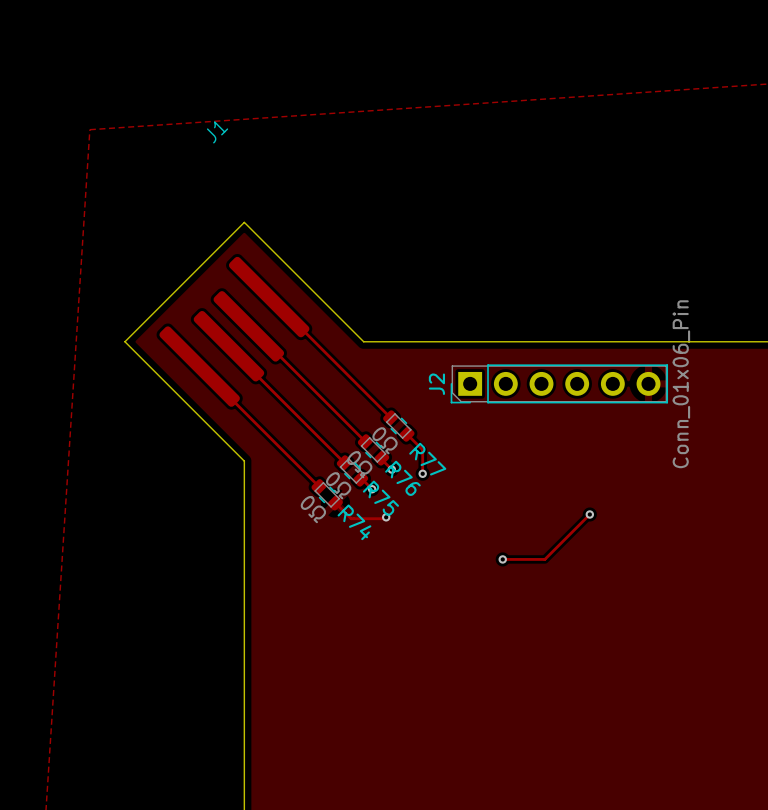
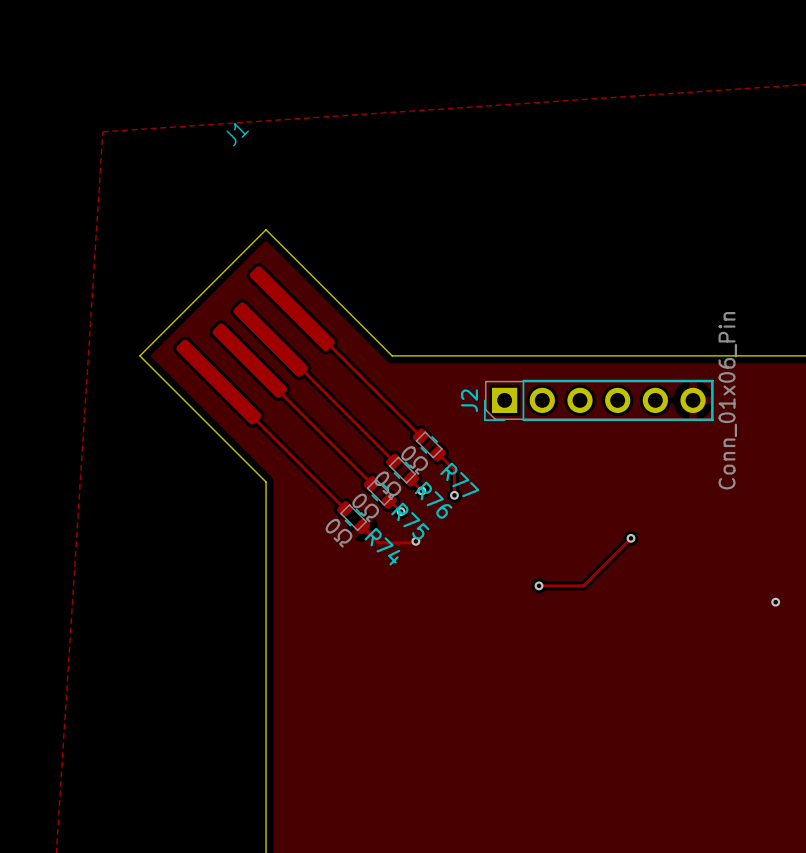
via: none -> (775, 602)

